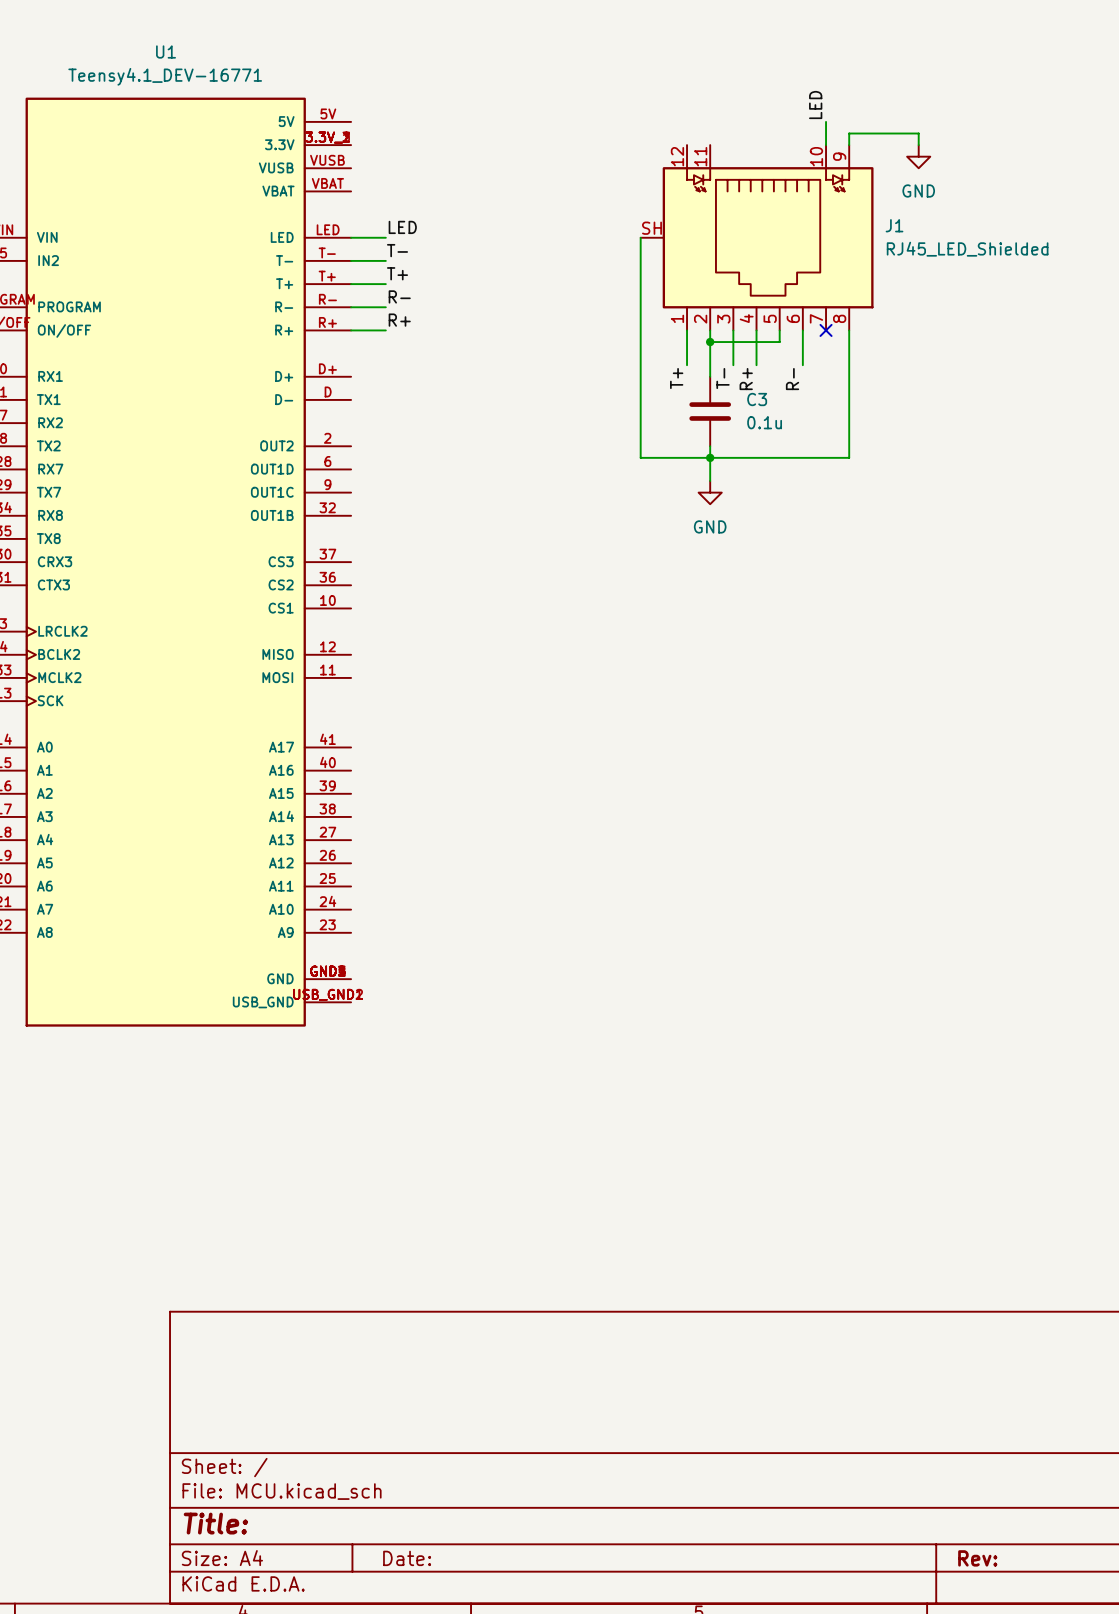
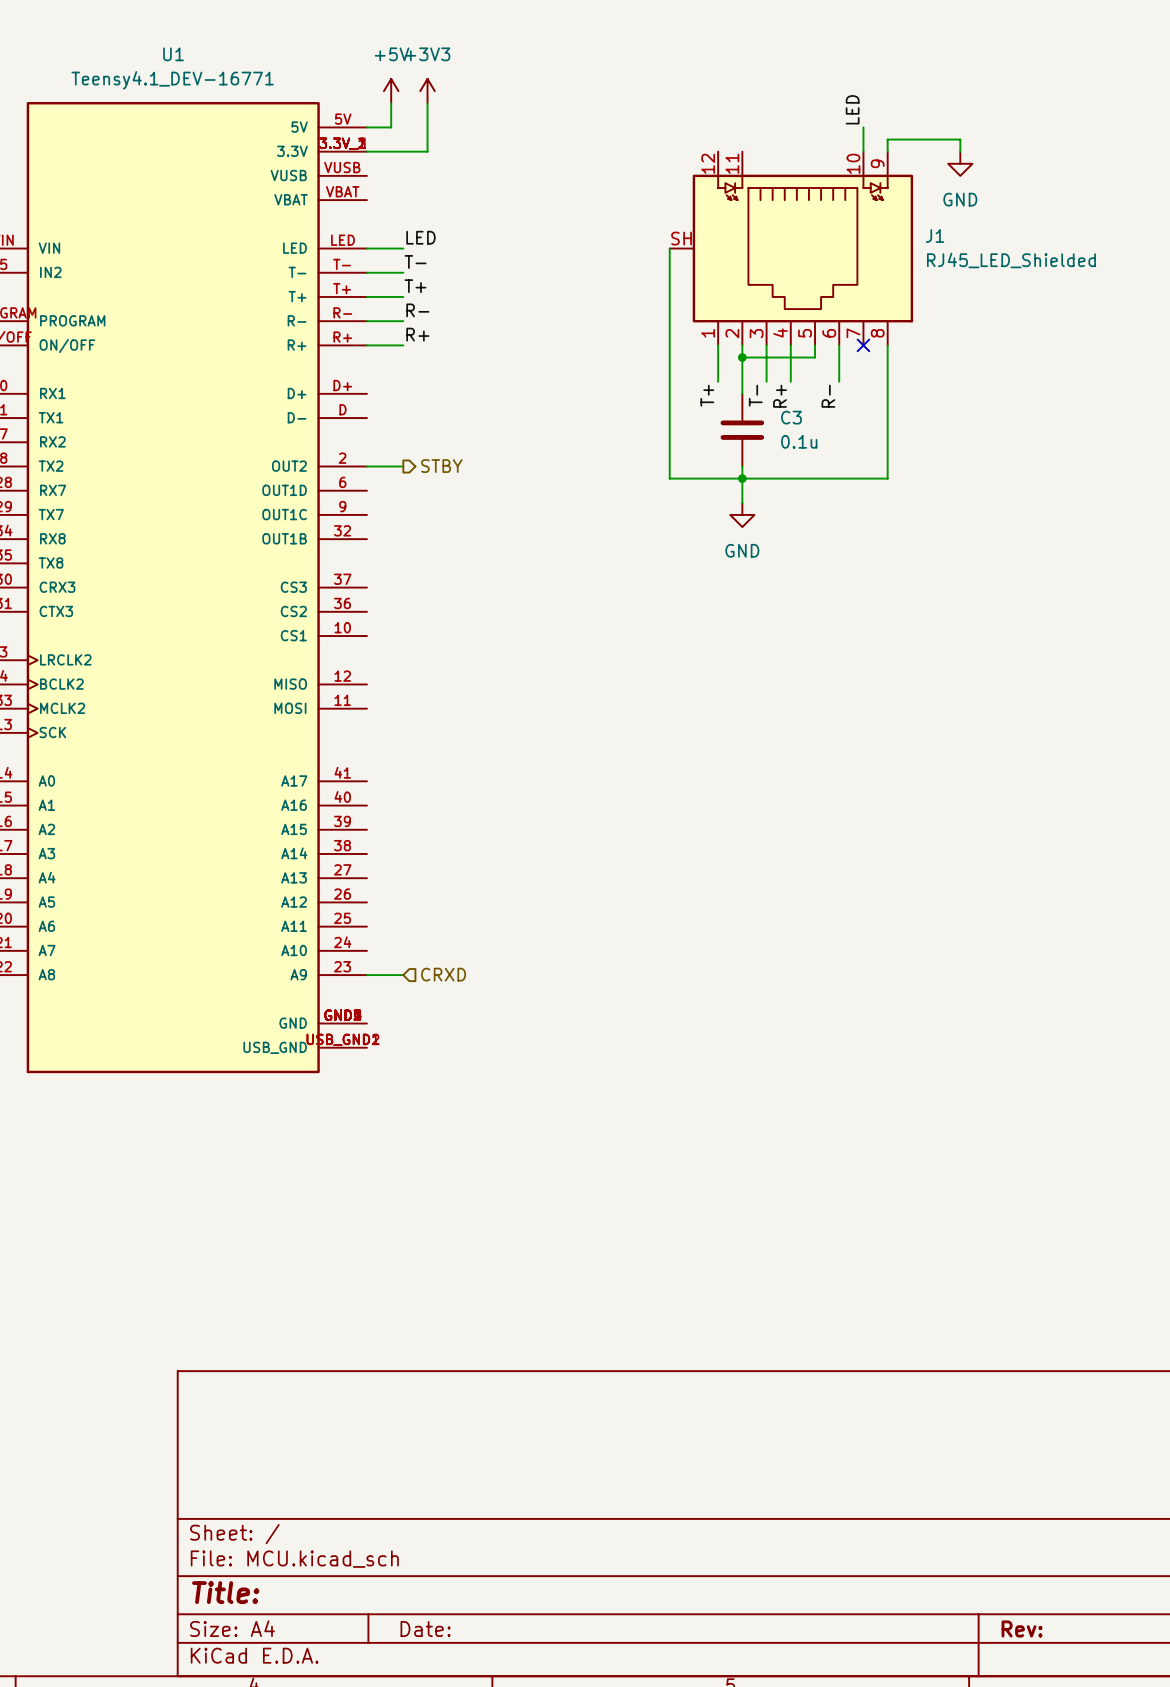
power symbol: none -> +5V (391, 91)
power symbol: none -> +3V3 (427, 91)
wire: none -> (391, 103) (391, 127) (366, 127)
wire: none -> (427, 103) (427, 151) (366, 151)
hierarchical label: none -> STBY (441, 466)
wire: none -> (366, 466) (403, 466)
wire: none -> (366, 975) (403, 975)
hierarchical label: none -> CRXD (443, 974)

